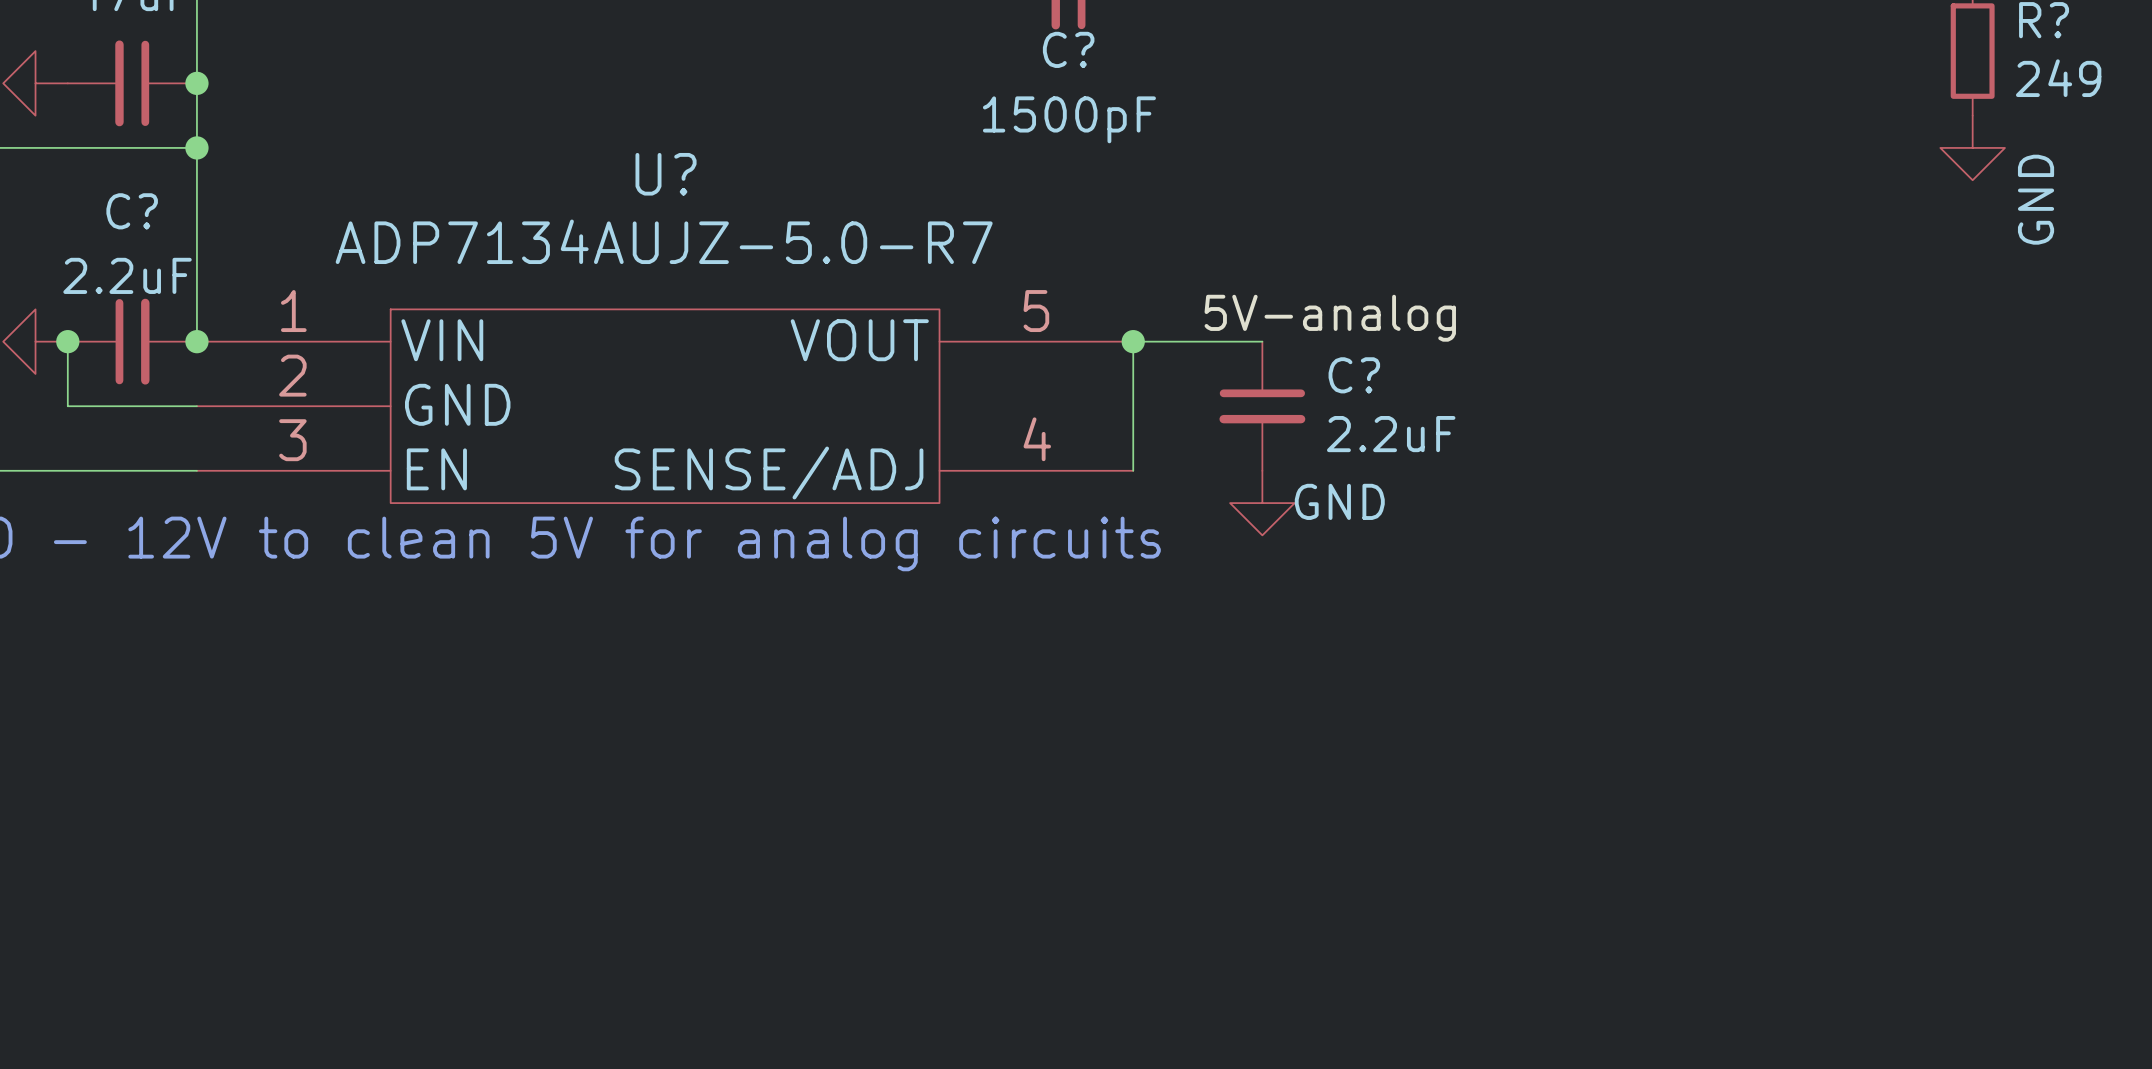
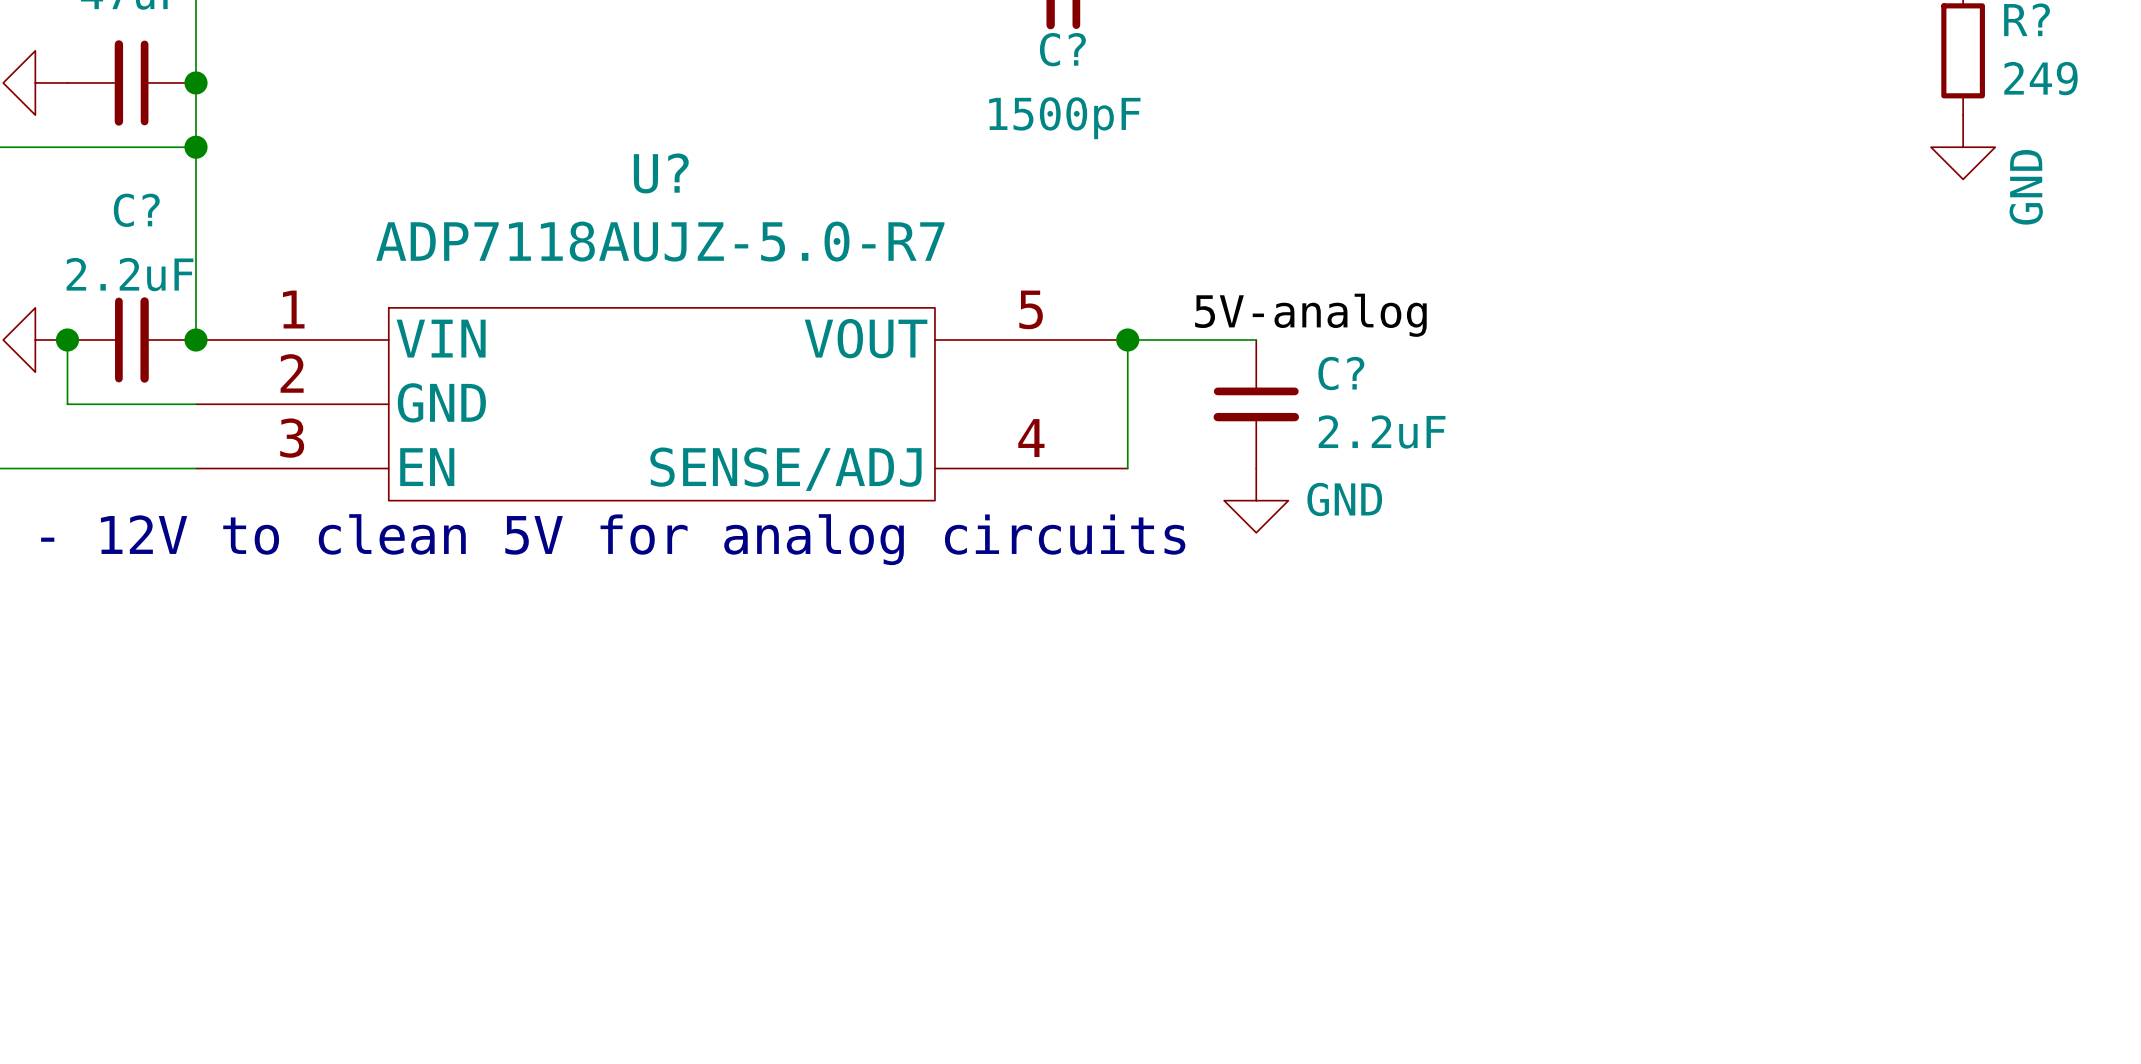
U? value: ADP7134AUJZ-5.0-R7 (664, 241) -> ADP7118AUJZ-5.0-R7 (660, 241)

